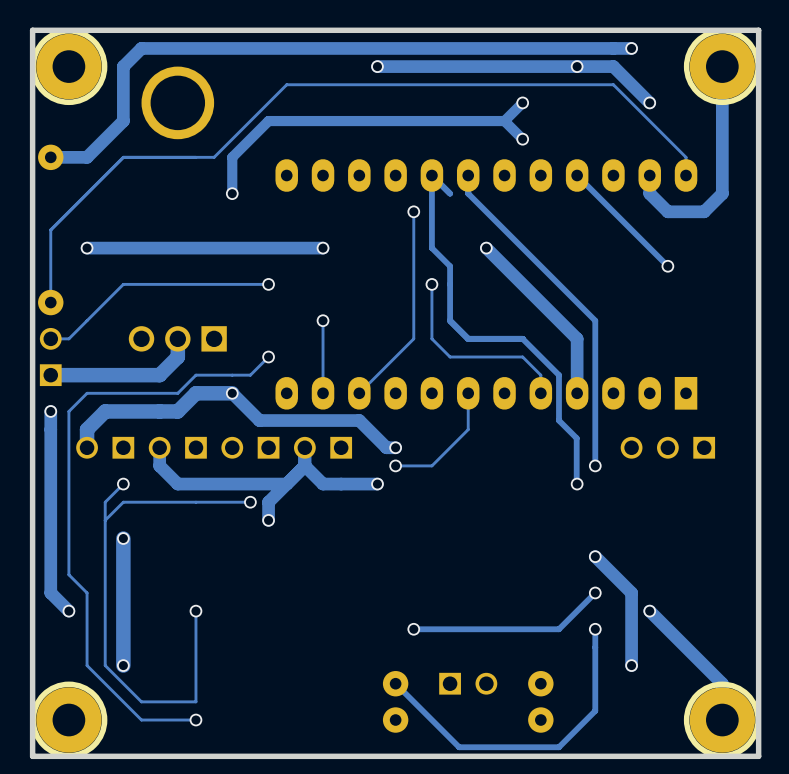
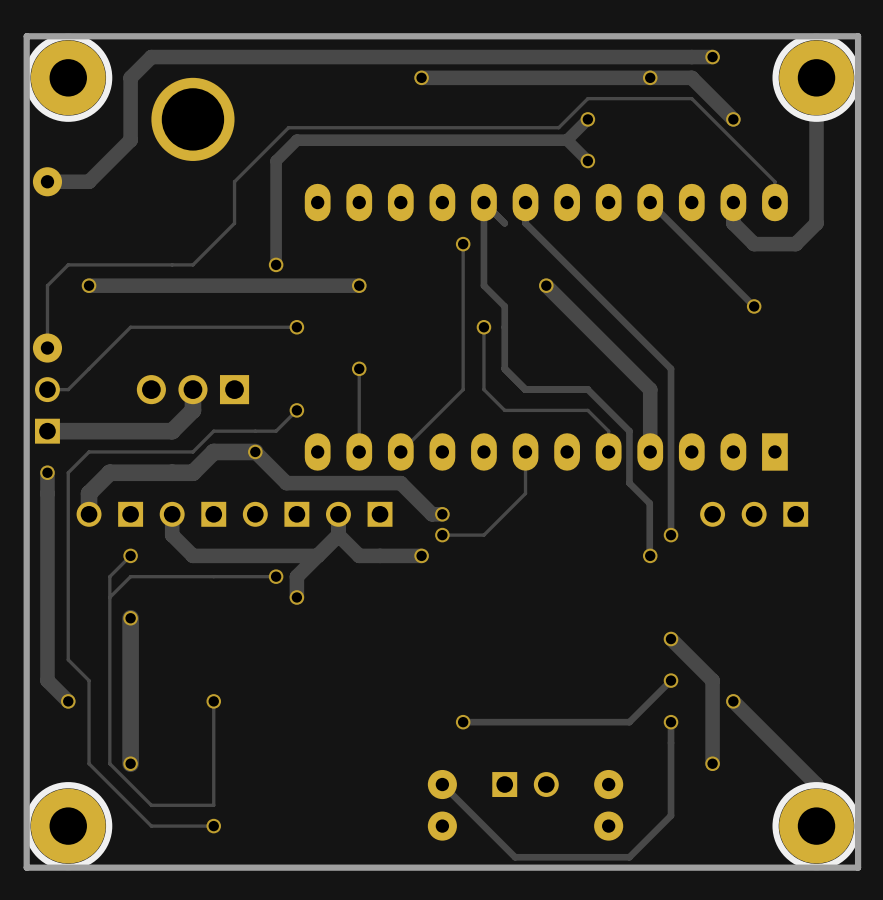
track: (522, 84) (286, 84) (261, 110) -> (587, 98) (558, 127) (288, 127)
track: (250, 139) (232, 157) (232, 193) -> (276, 160) (276, 264)
track: (214, 157) (123, 157) (50, 229) (50, 248) -> (234, 181) (234, 223) (192, 264) (68, 264) (47, 285)
via position: (232, 193) -> (276, 264)

